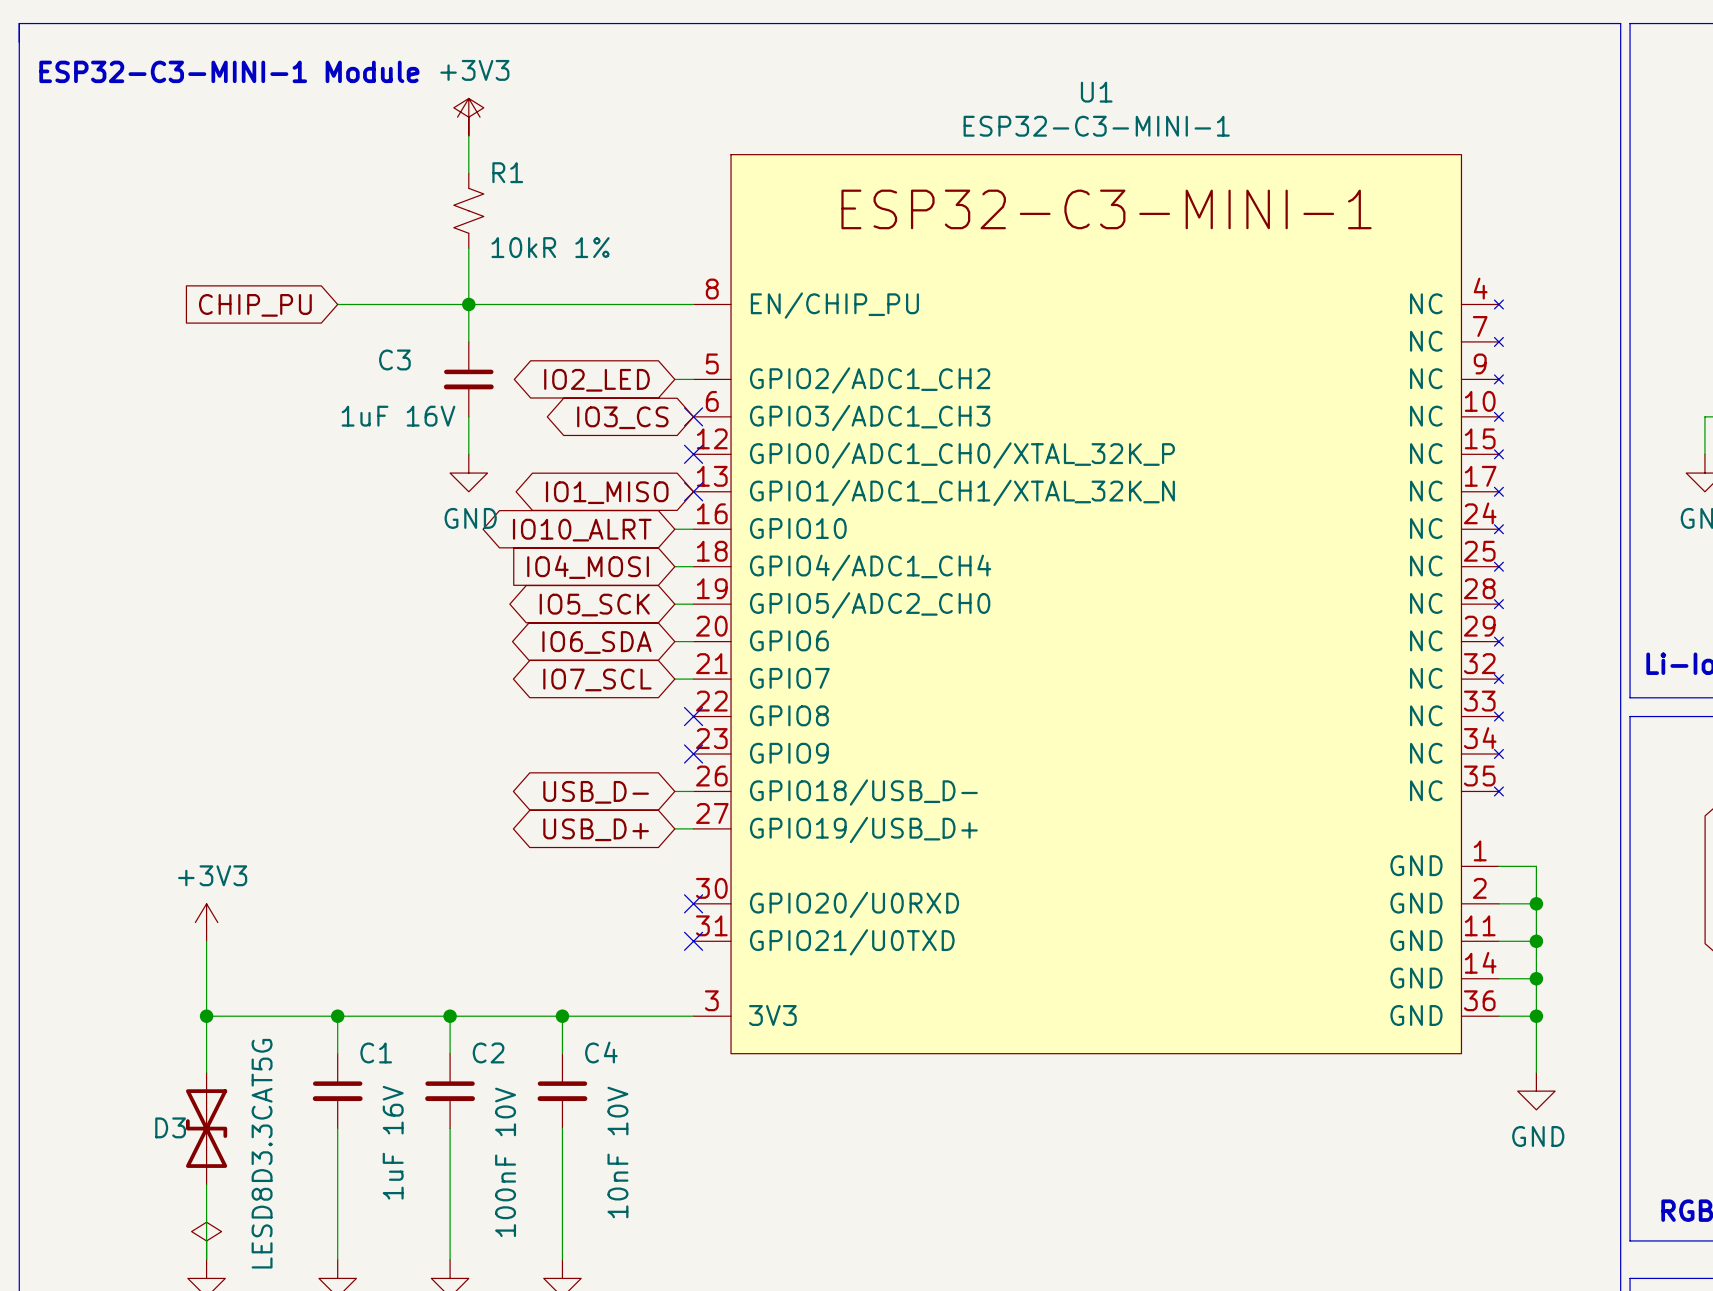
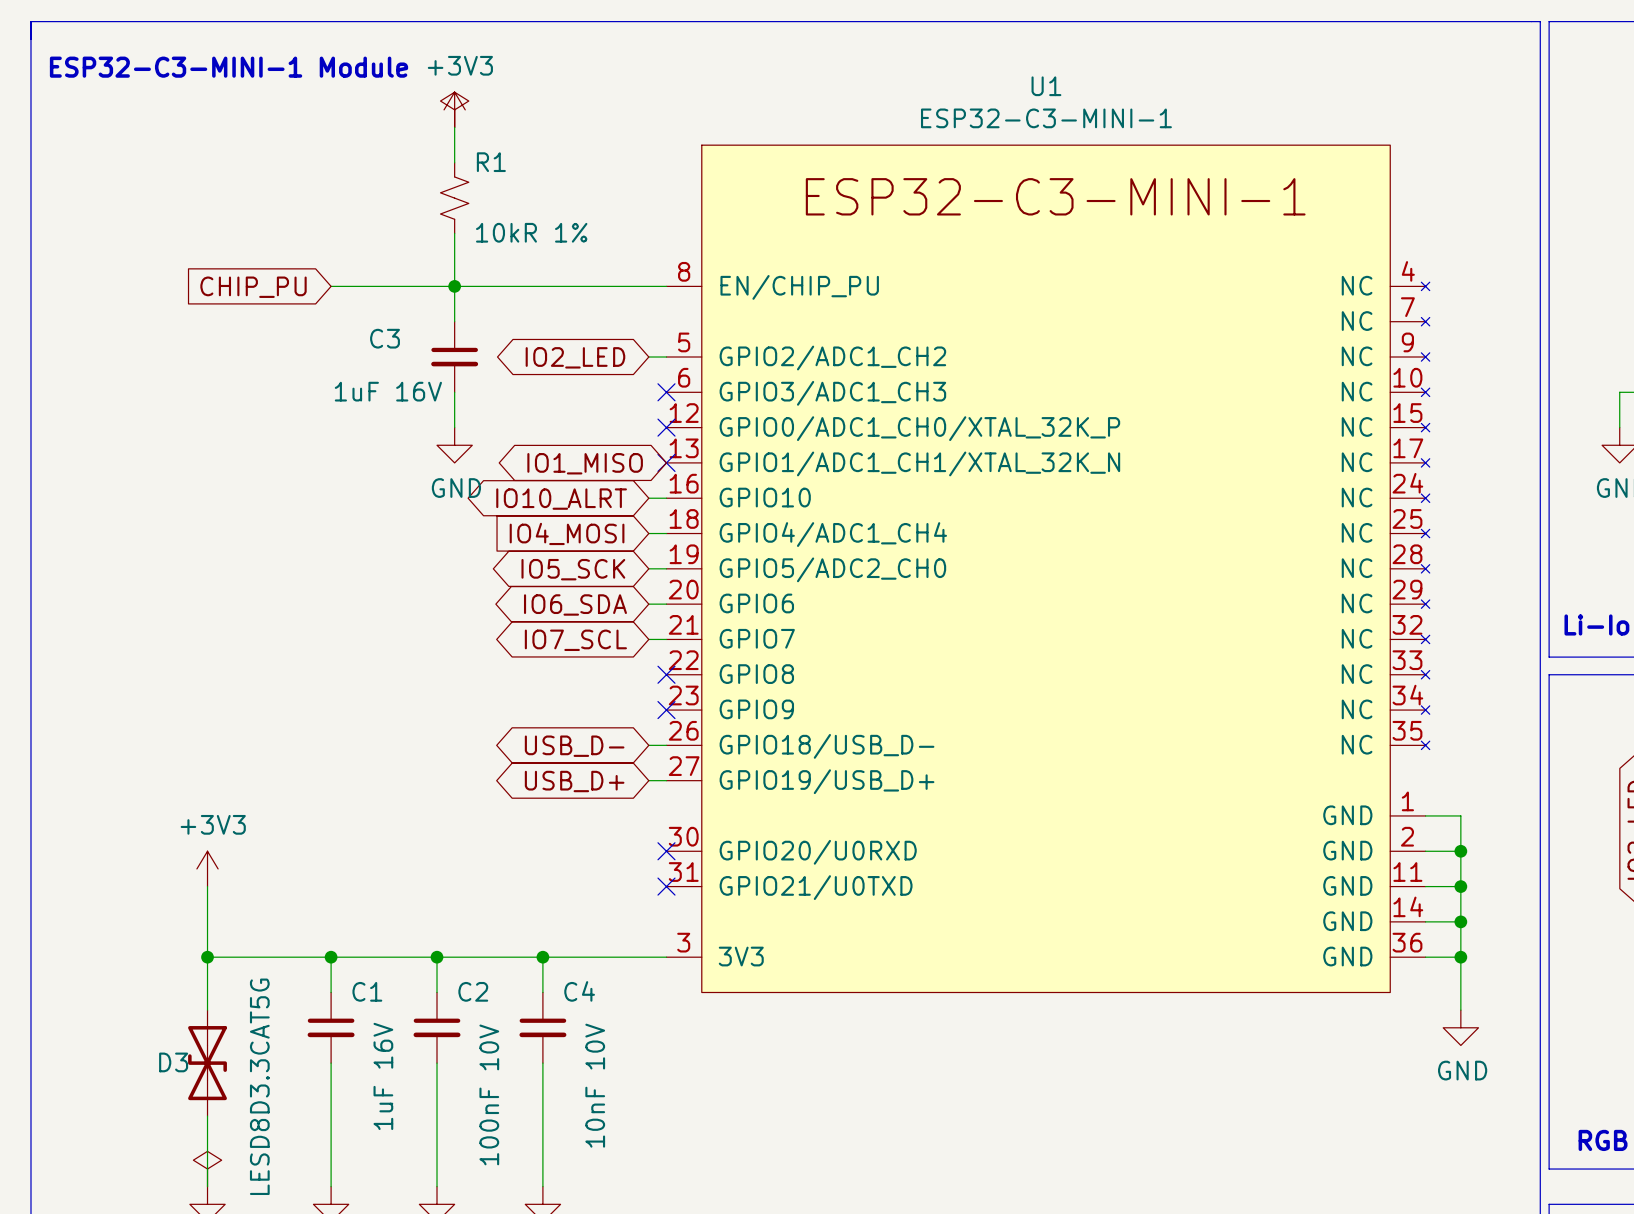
global label: IO3_CS (622, 417) -> none

